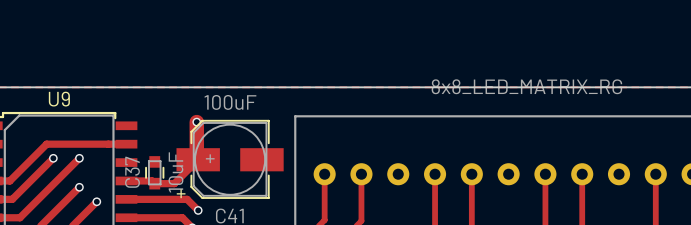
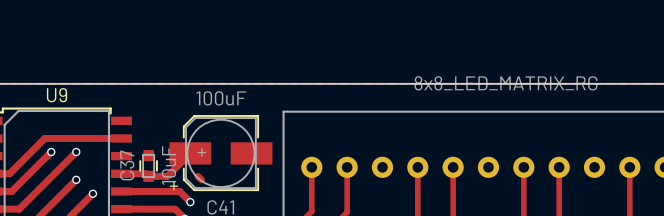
track: (196, 122) (198, 159) -> none
via: (196, 122) -> none
track: none -> (198, 176) (201, 179)

